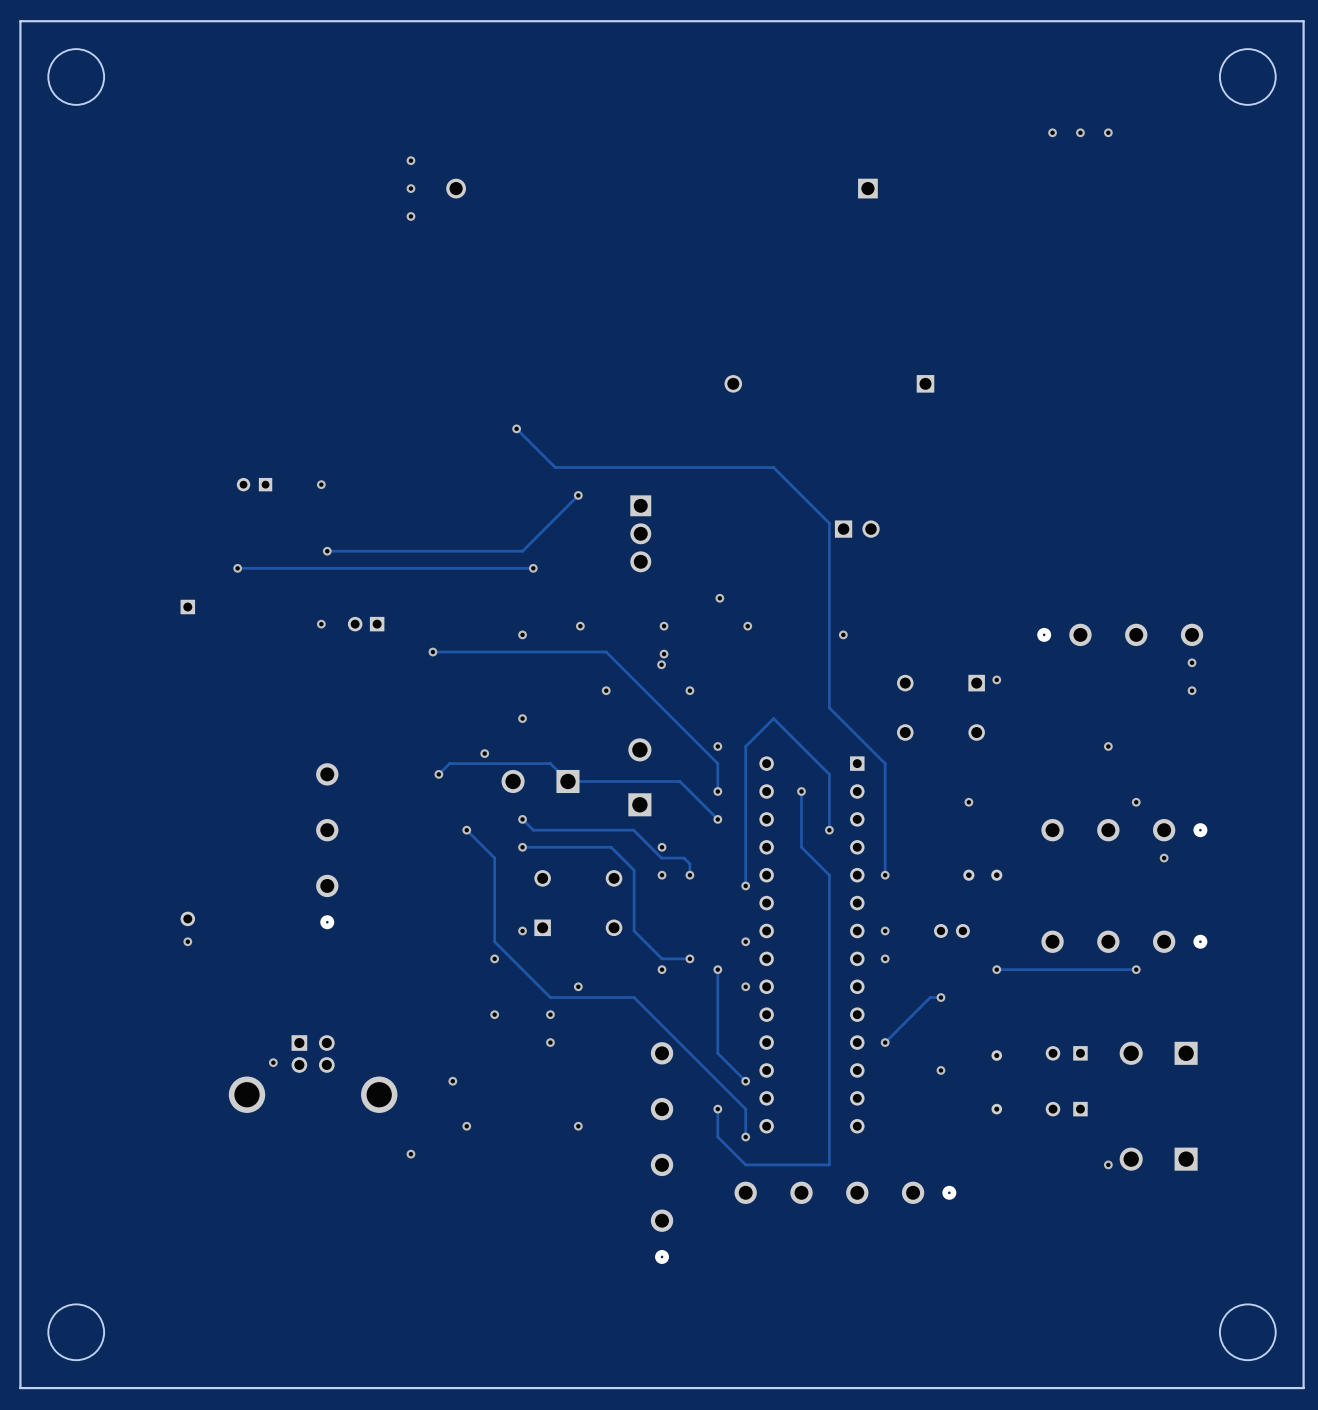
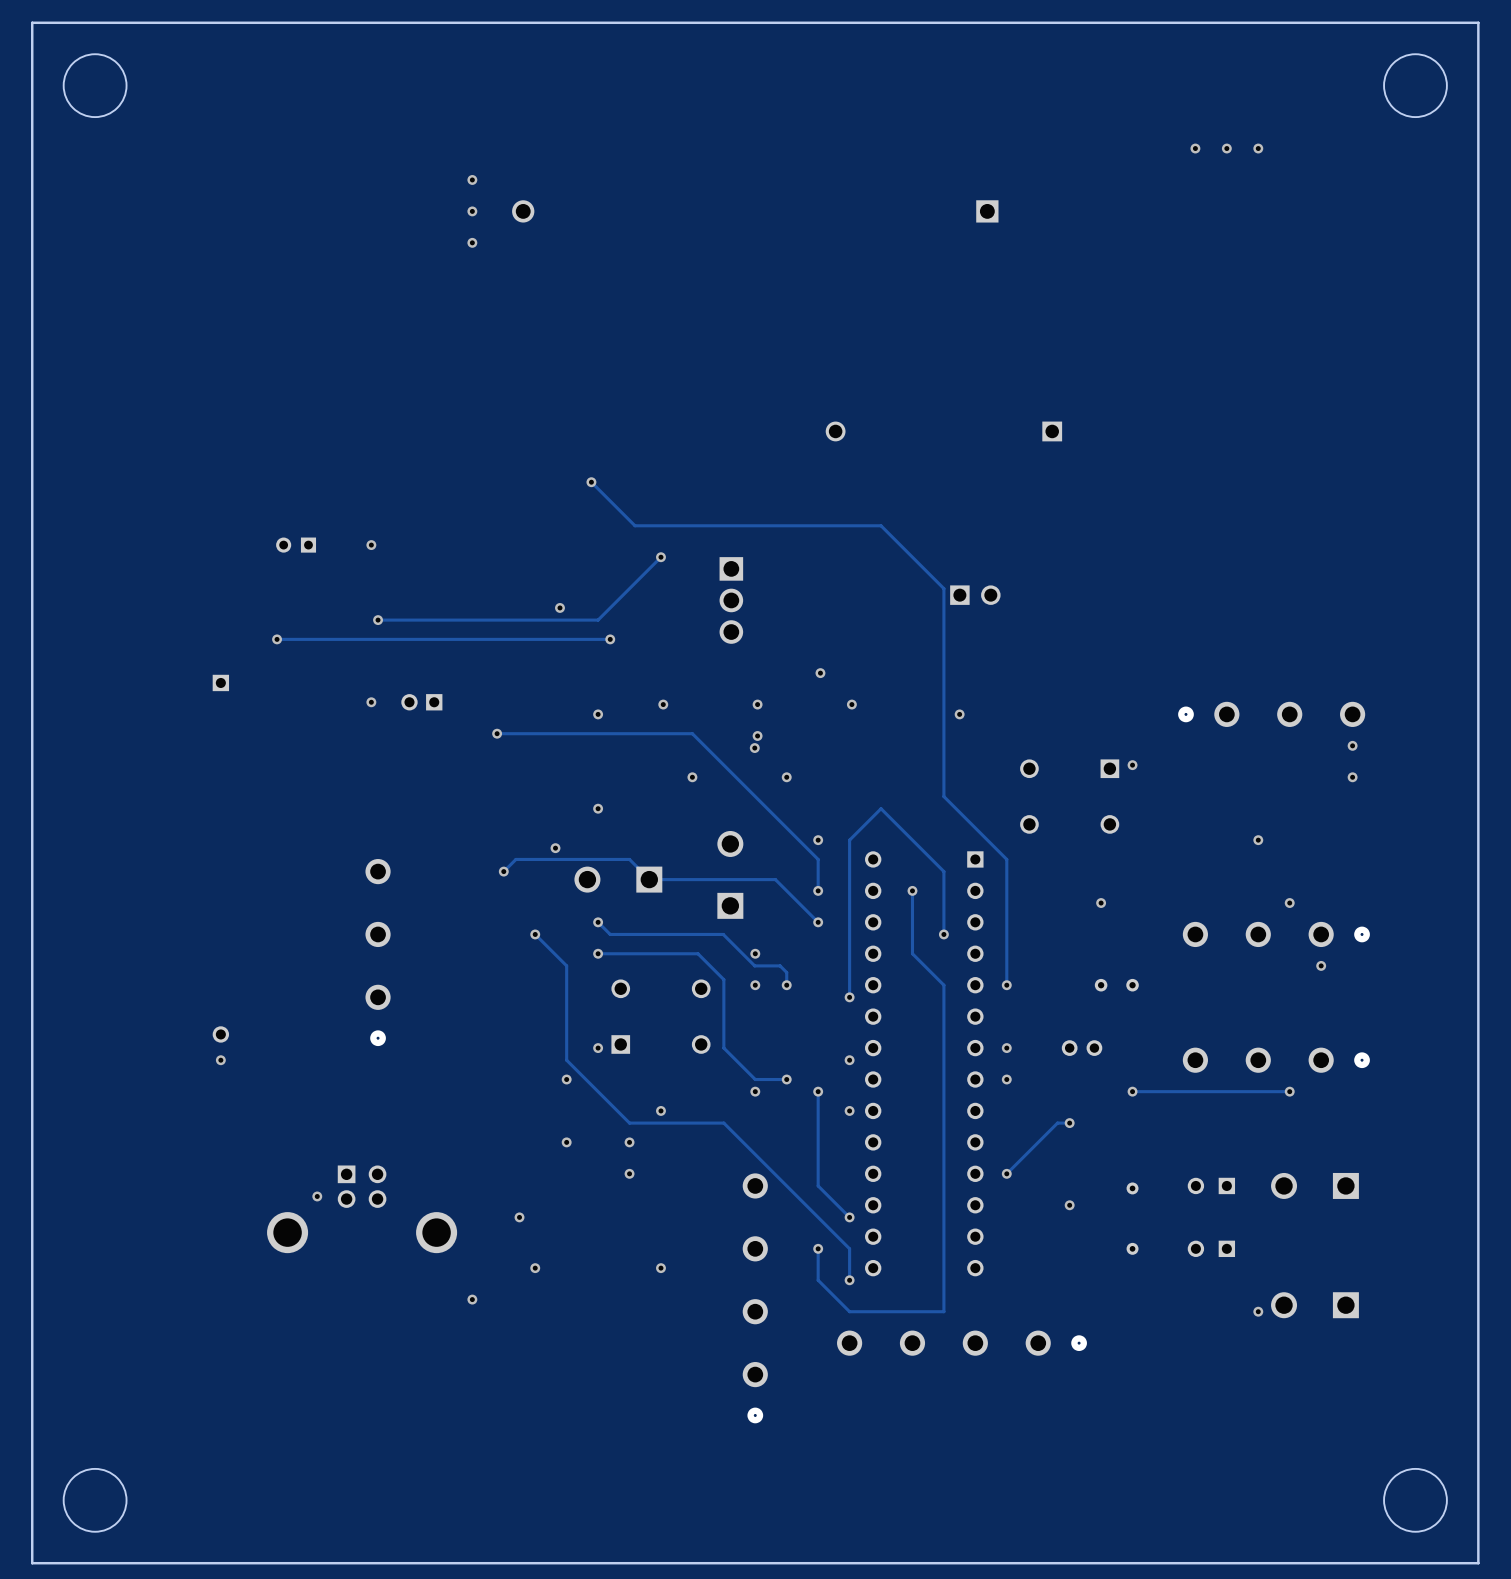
via: none -> (559, 607)

